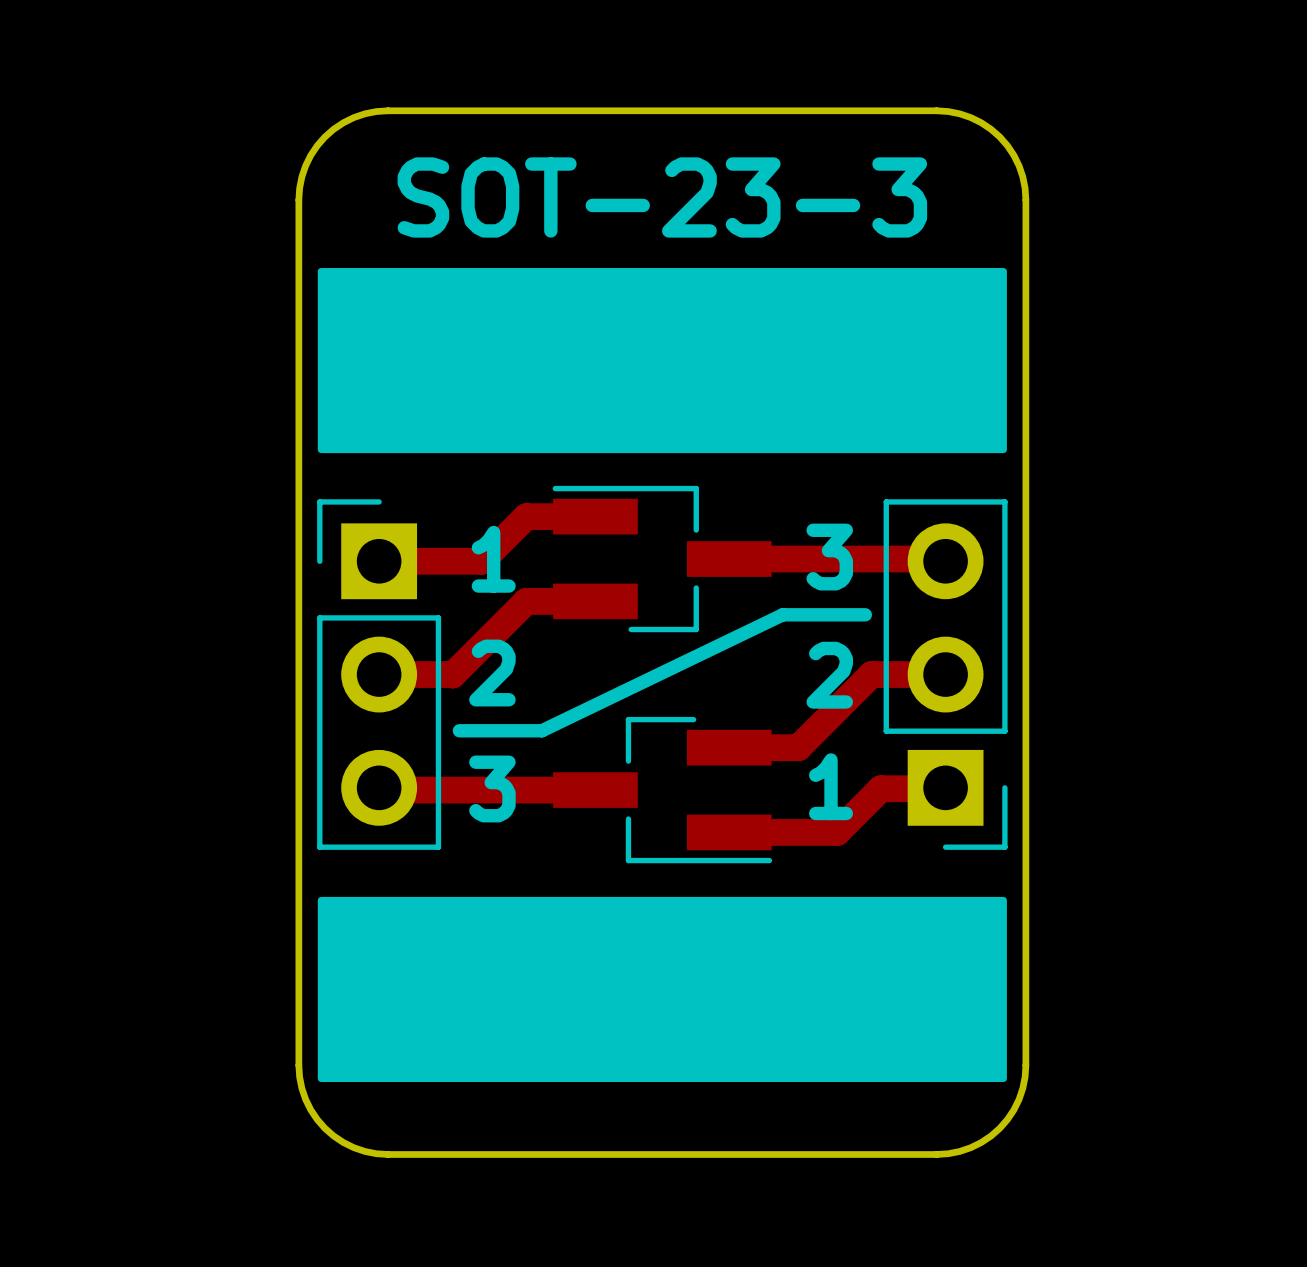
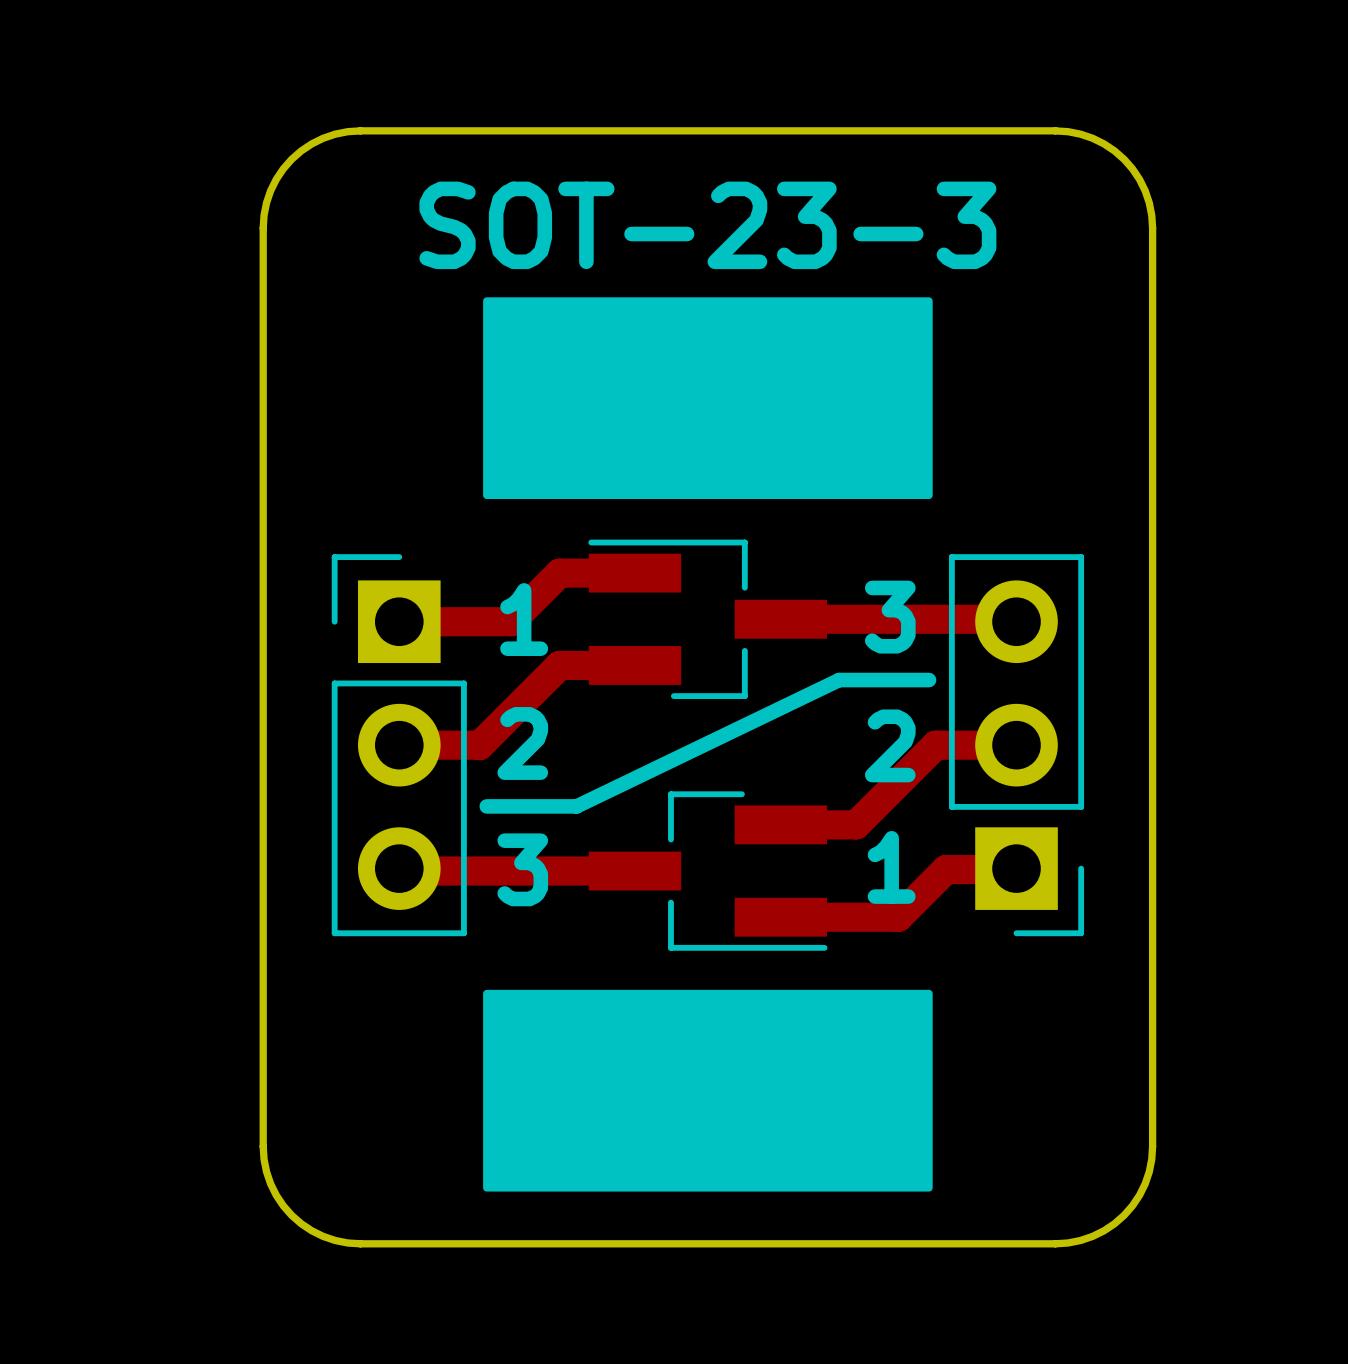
board edge: (388, 110) (364, 113) (353, 117) (333, 129) (324, 136) (317, 145) (305, 165) (301, 176) (298, 199) (299, 1076) (305, 1099) (317, 1119) (324, 1128) (343, 1142) (353, 1147) (364, 1151) (388, 1154) (948, 1153) (970, 1147) (981, 1142) (999, 1128) (1013, 1109) (1022, 1088) (1025, 1065) (1025, 188) (1019, 165) (1013, 155) (1007, 145) (990, 129) (970, 117) (959, 113) (936, 110) -> (409, 130) (347, 131) (335, 134) (311, 143) (291, 159) (276, 179) (266, 202) (263, 228) (264, 1159) (270, 1183) (283, 1205) (291, 1215) (311, 1230) (323, 1236) (335, 1240) (360, 1243) (1055, 1243) (1080, 1240) (1104, 1230) (1124, 1215) (1139, 1195) (1149, 1171) (1152, 1146) (1151, 215) (1145, 190) (1139, 179) (1124, 159) (1104, 143) (1080, 134) (1068, 131) (1006, 130)
drawing shape: [317, 268, 1007, 454] -> [483, 297, 933, 500]
drawing shape: [317, 896, 1007, 1083] -> [483, 989, 933, 1192]

